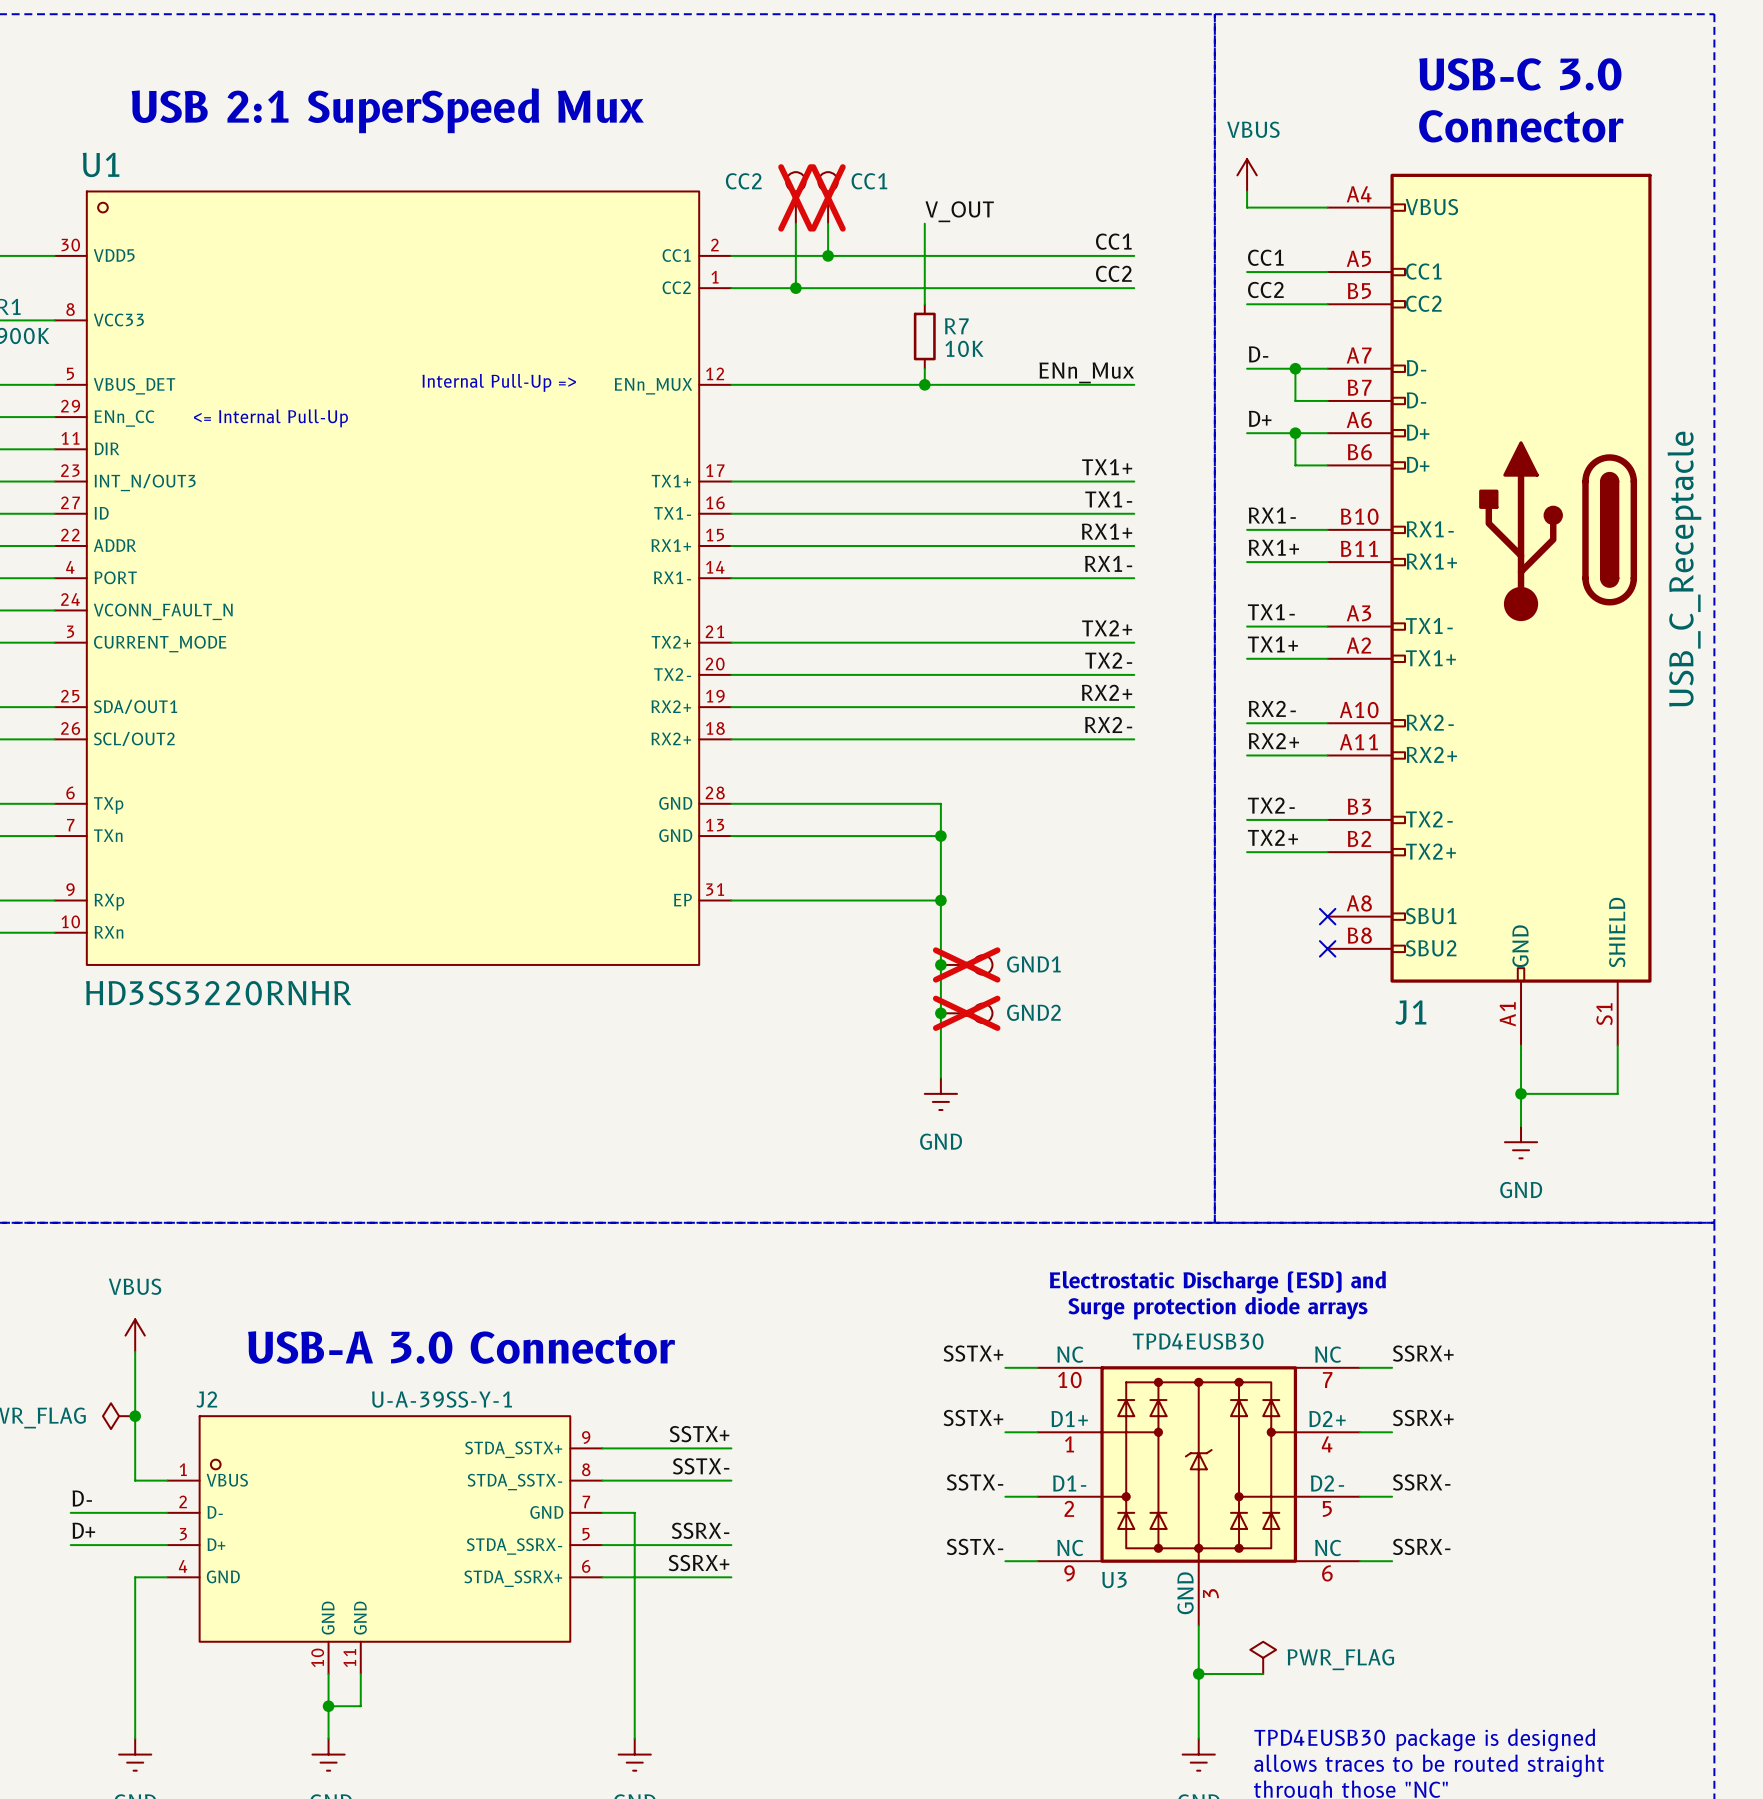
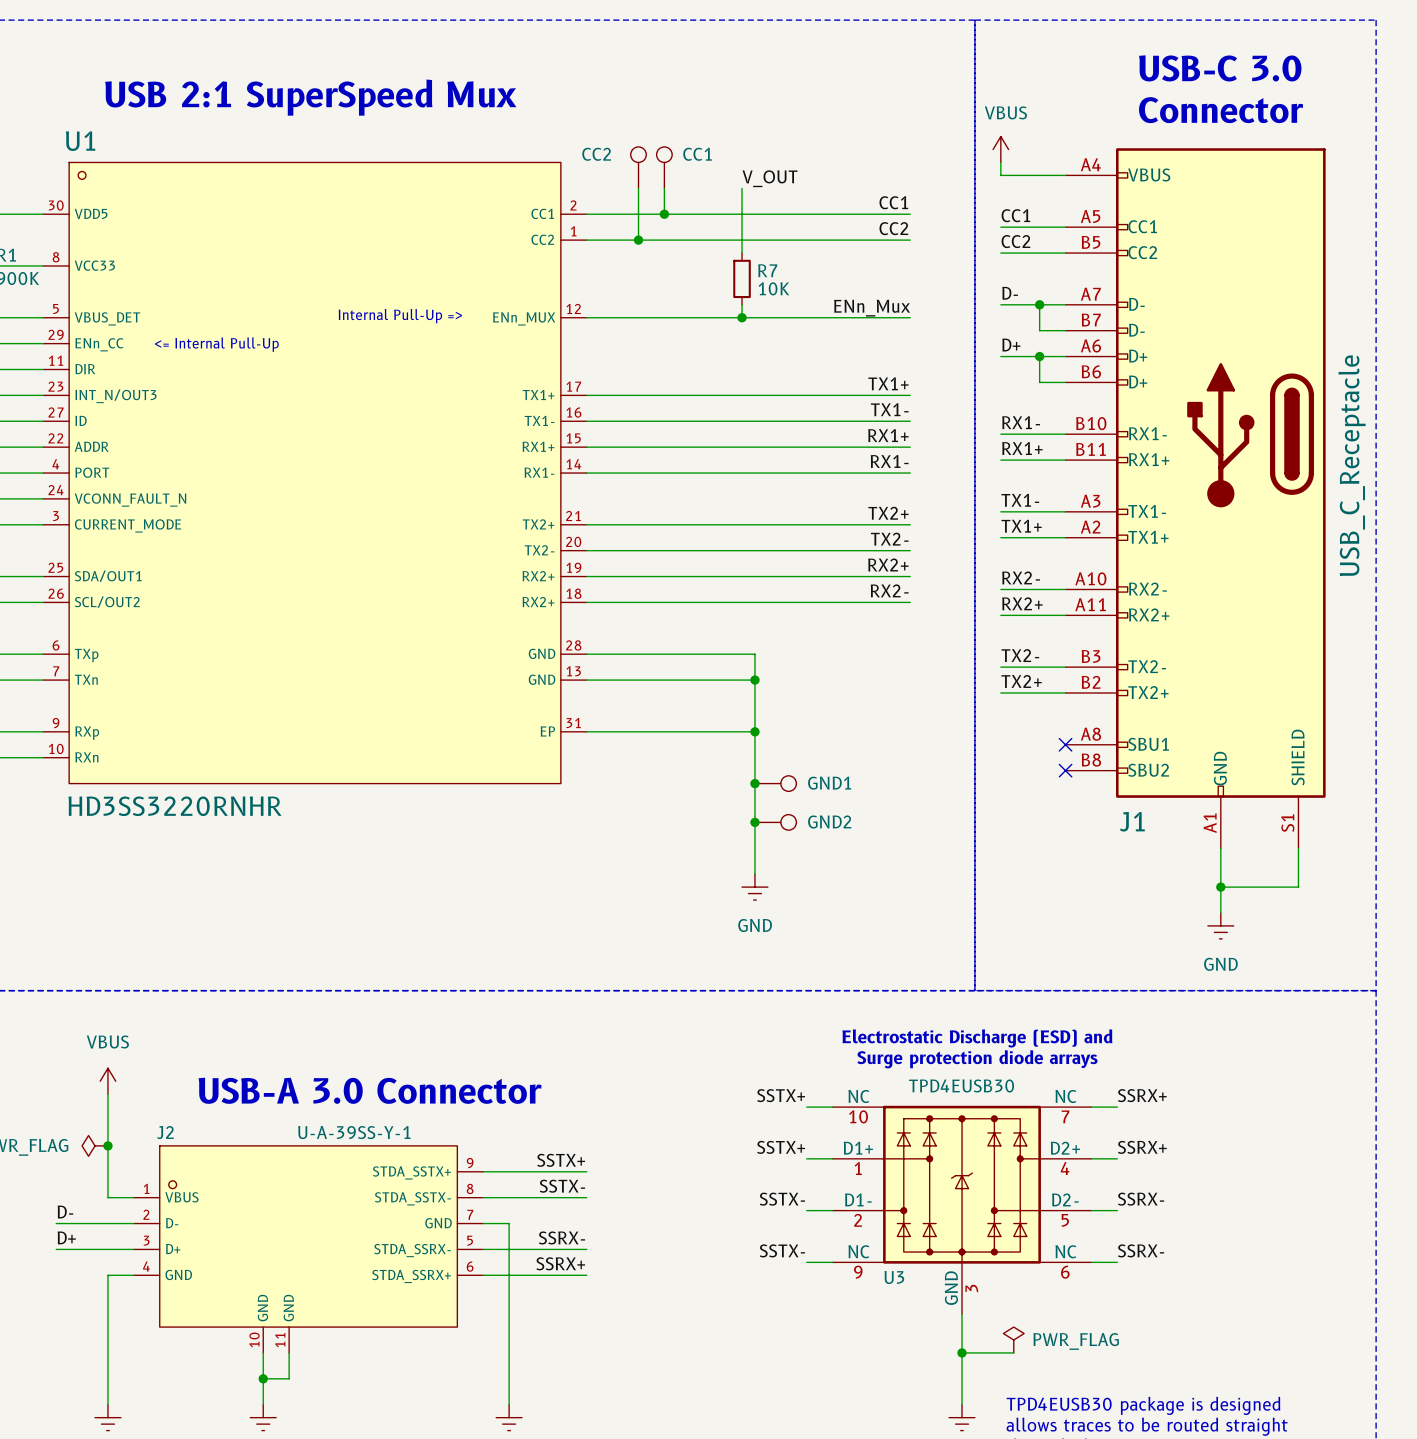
part do-not-place cross: (795, 197) -> none
part do-not-place cross: (828, 197) -> none
part do-not-place cross: (966, 964) -> none
part do-not-place cross: (966, 1013) -> none

